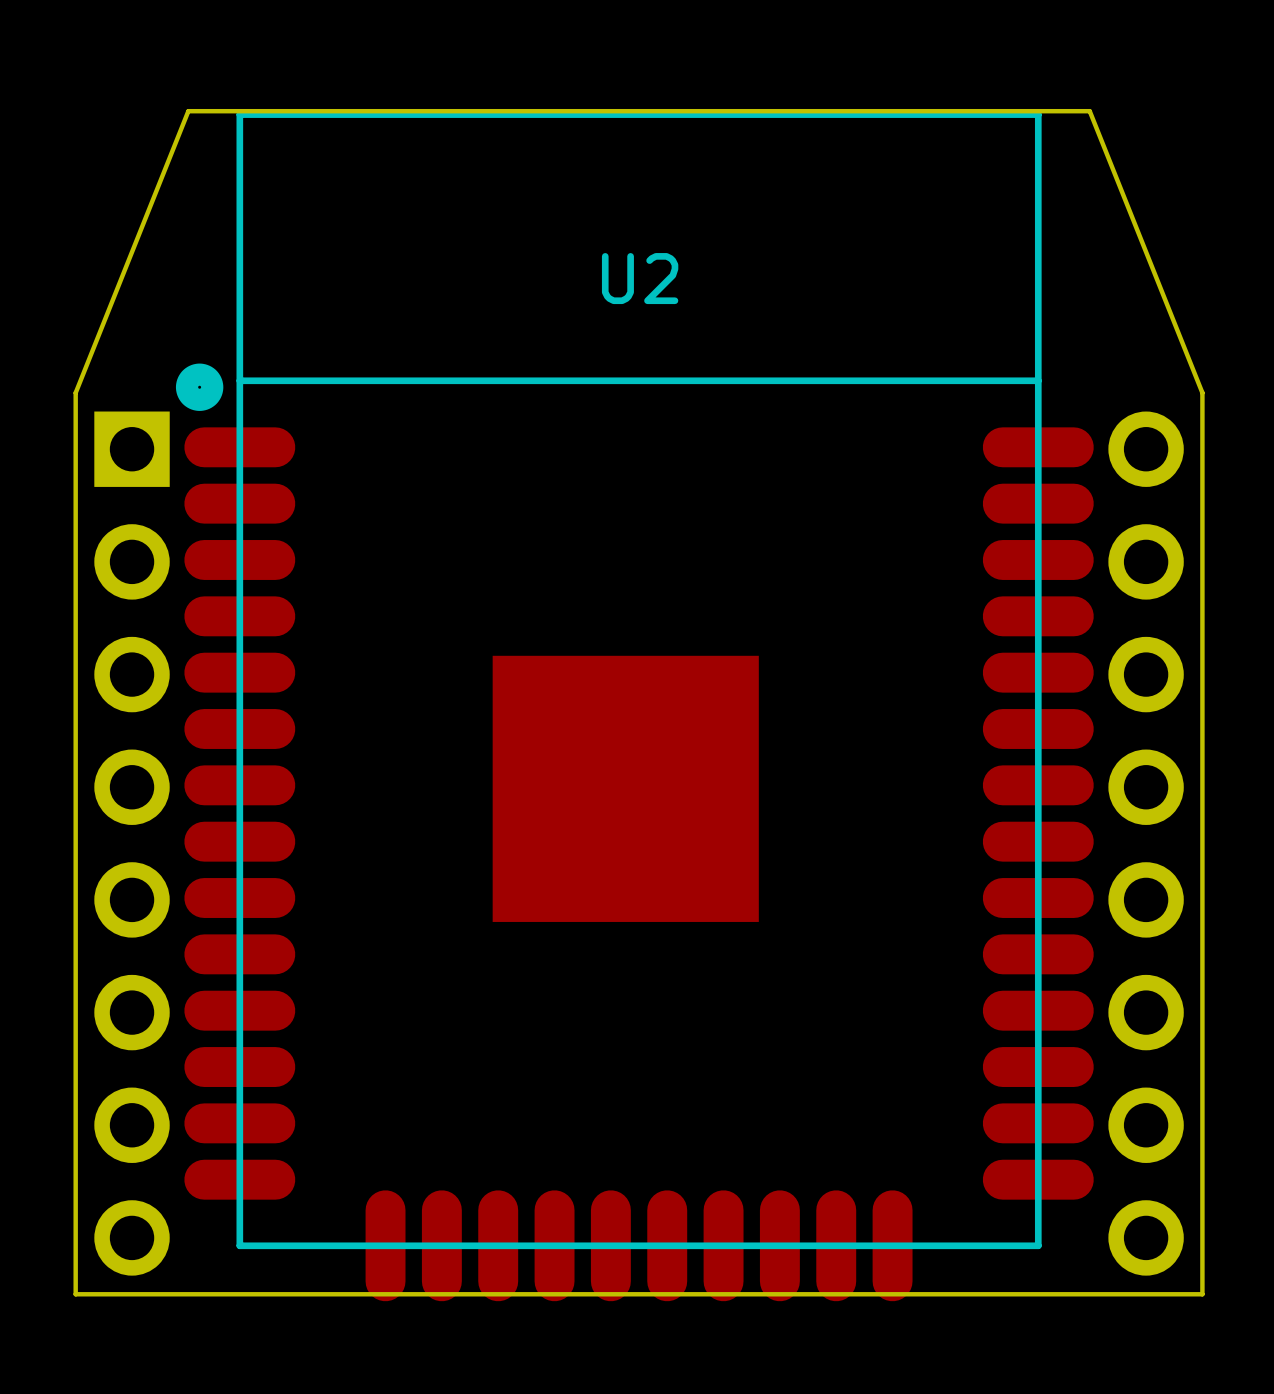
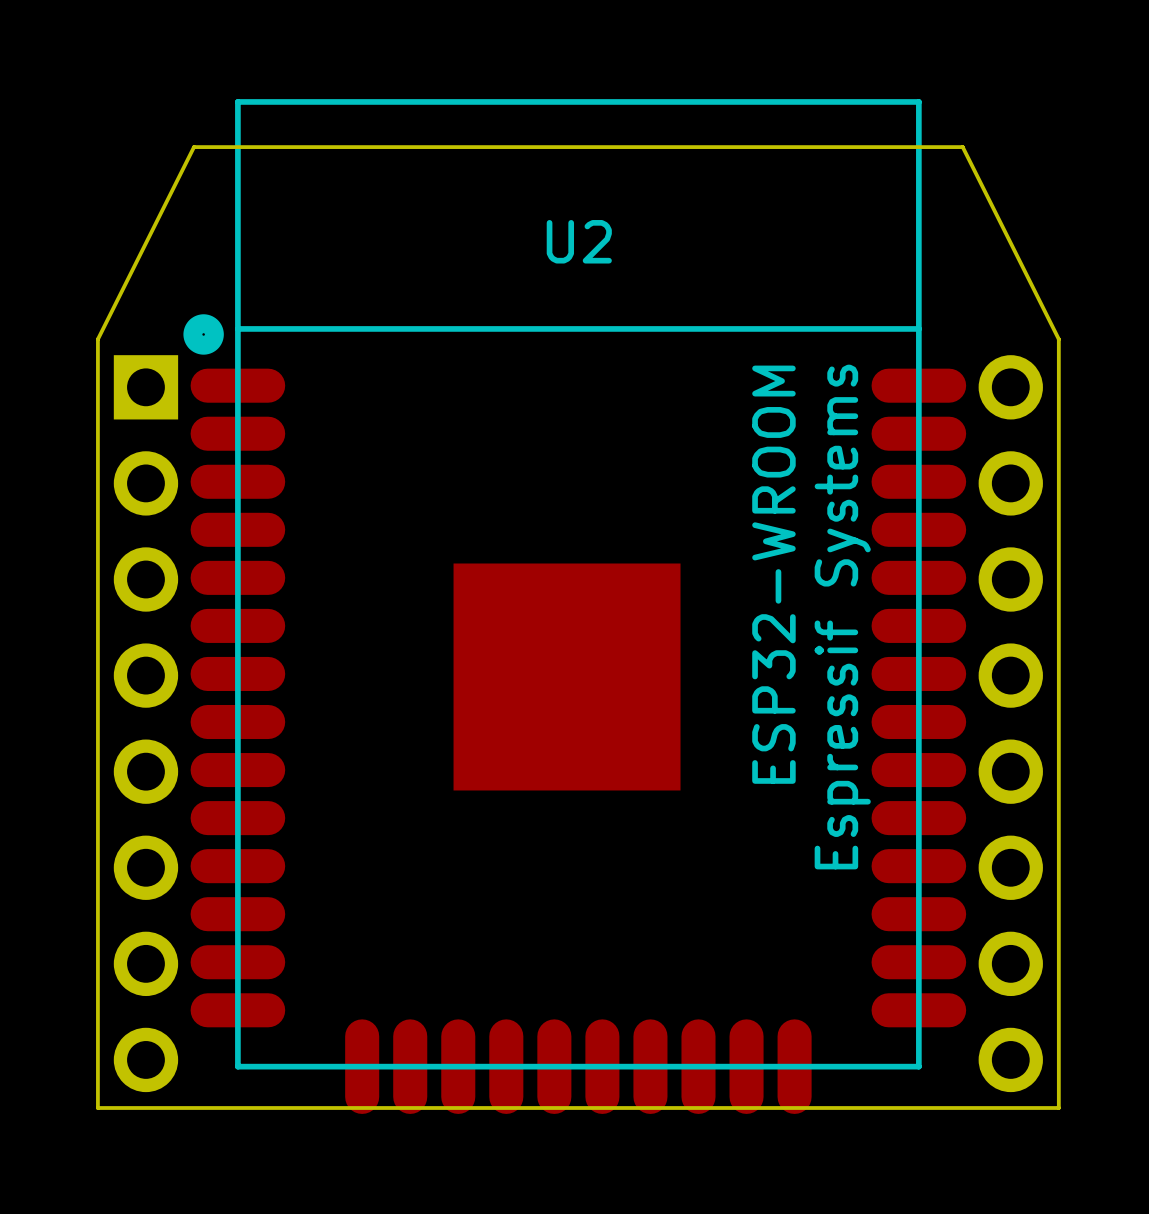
board edge: (75, 392) (188, 111) (1089, 111) (1202, 392) -> (97, 339) (194, 147) (962, 147) (1058, 339)
U2 text: none -> ESP32-WROOM (773, 574)
U2 text: none -> Espressif Systems (842, 617)

